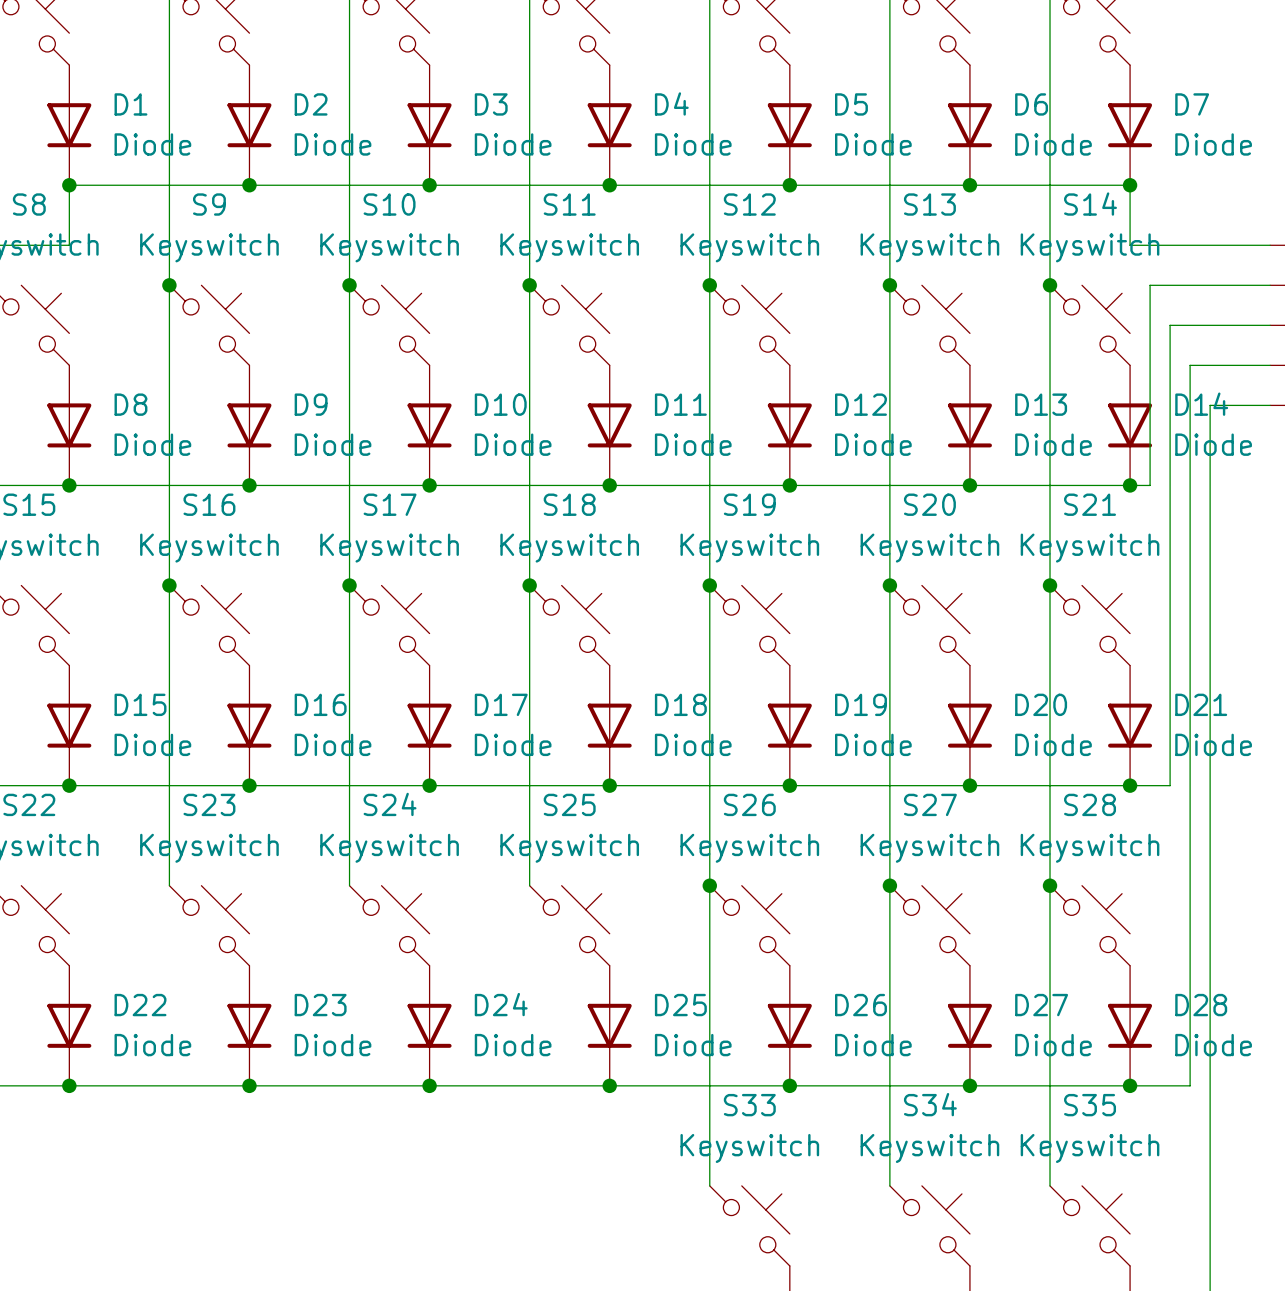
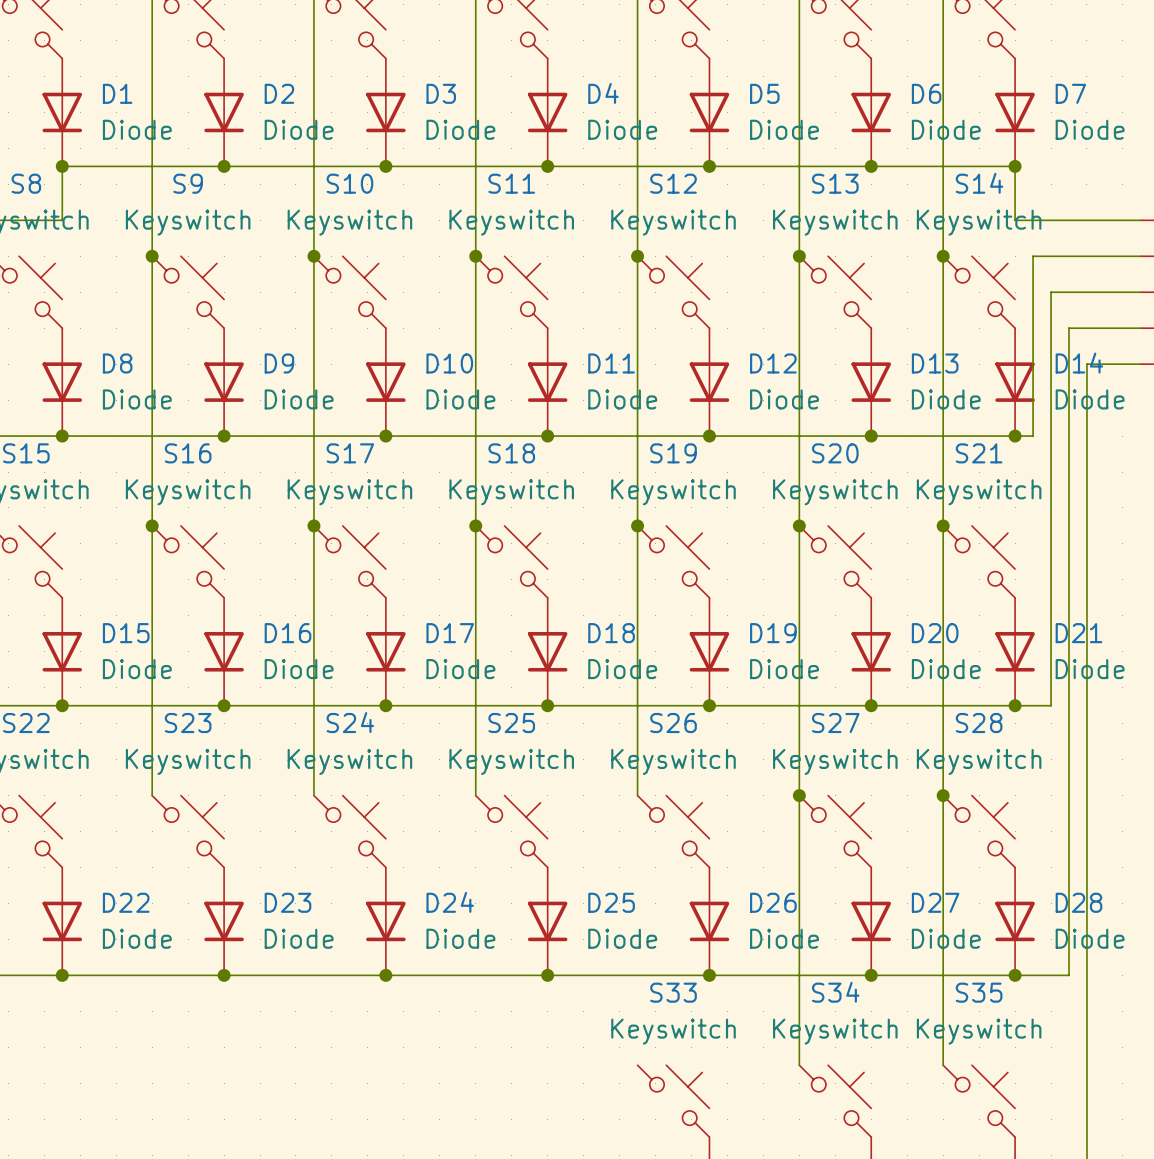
wire: (709, 885) (709, 1185) -> none
junction: (709, 885) -> none

